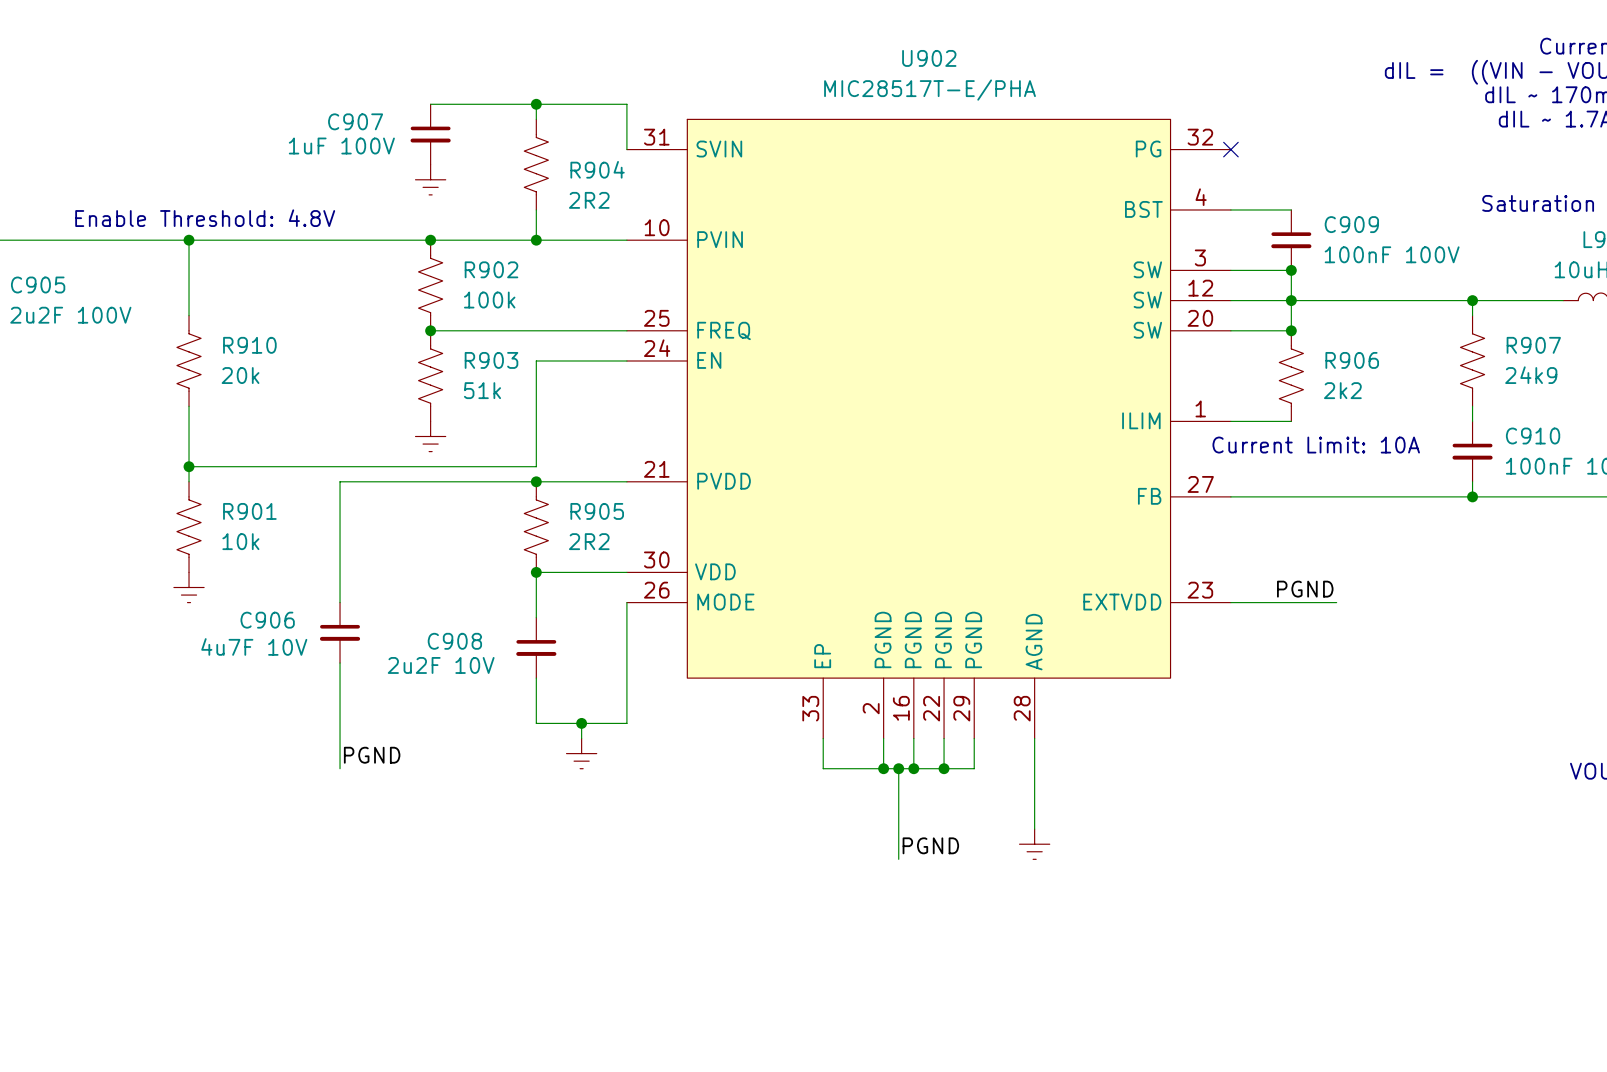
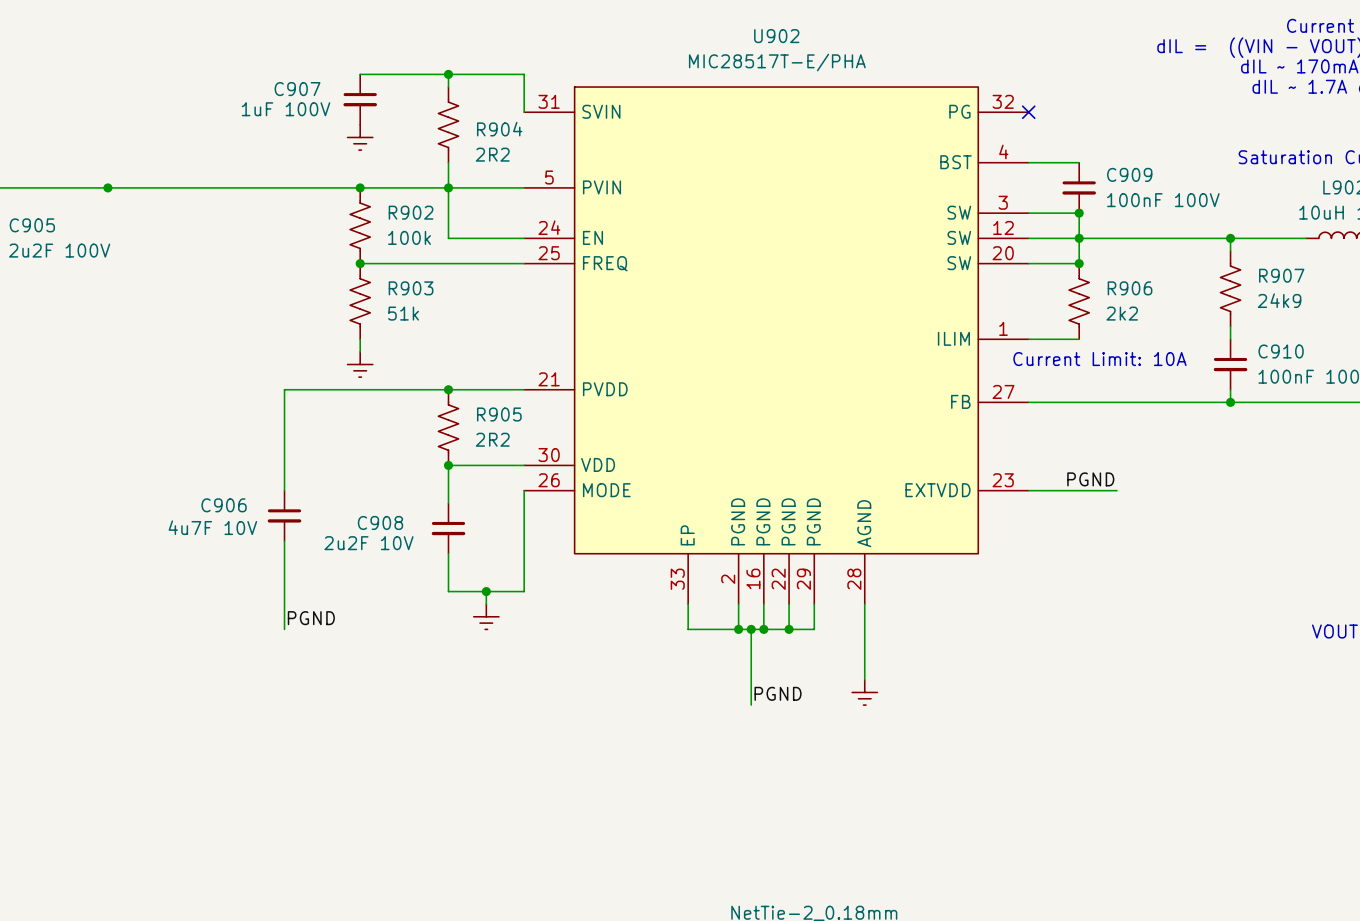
U902 symbol: [626, 119, 1231, 739] -> [524, 87, 1029, 605]
text: Enable Threshold: 4.8V (205, 218) -> none
wire: (189, 240) (189, 315) -> none
junction position: (189, 240) -> (107, 187)
wire: none -> (448, 187) (448, 238) (524, 238)
R910: 20k (189, 360) -> none
wire: (626, 360) (536, 360) (536, 466) (189, 466) -> none
wire: (189, 406) (189, 481) -> none
power symbol position: (430, 436) -> (360, 364)
junction: (189, 466) -> none
R901: 10k (189, 527) -> none
power symbol: (189, 587) -> none

